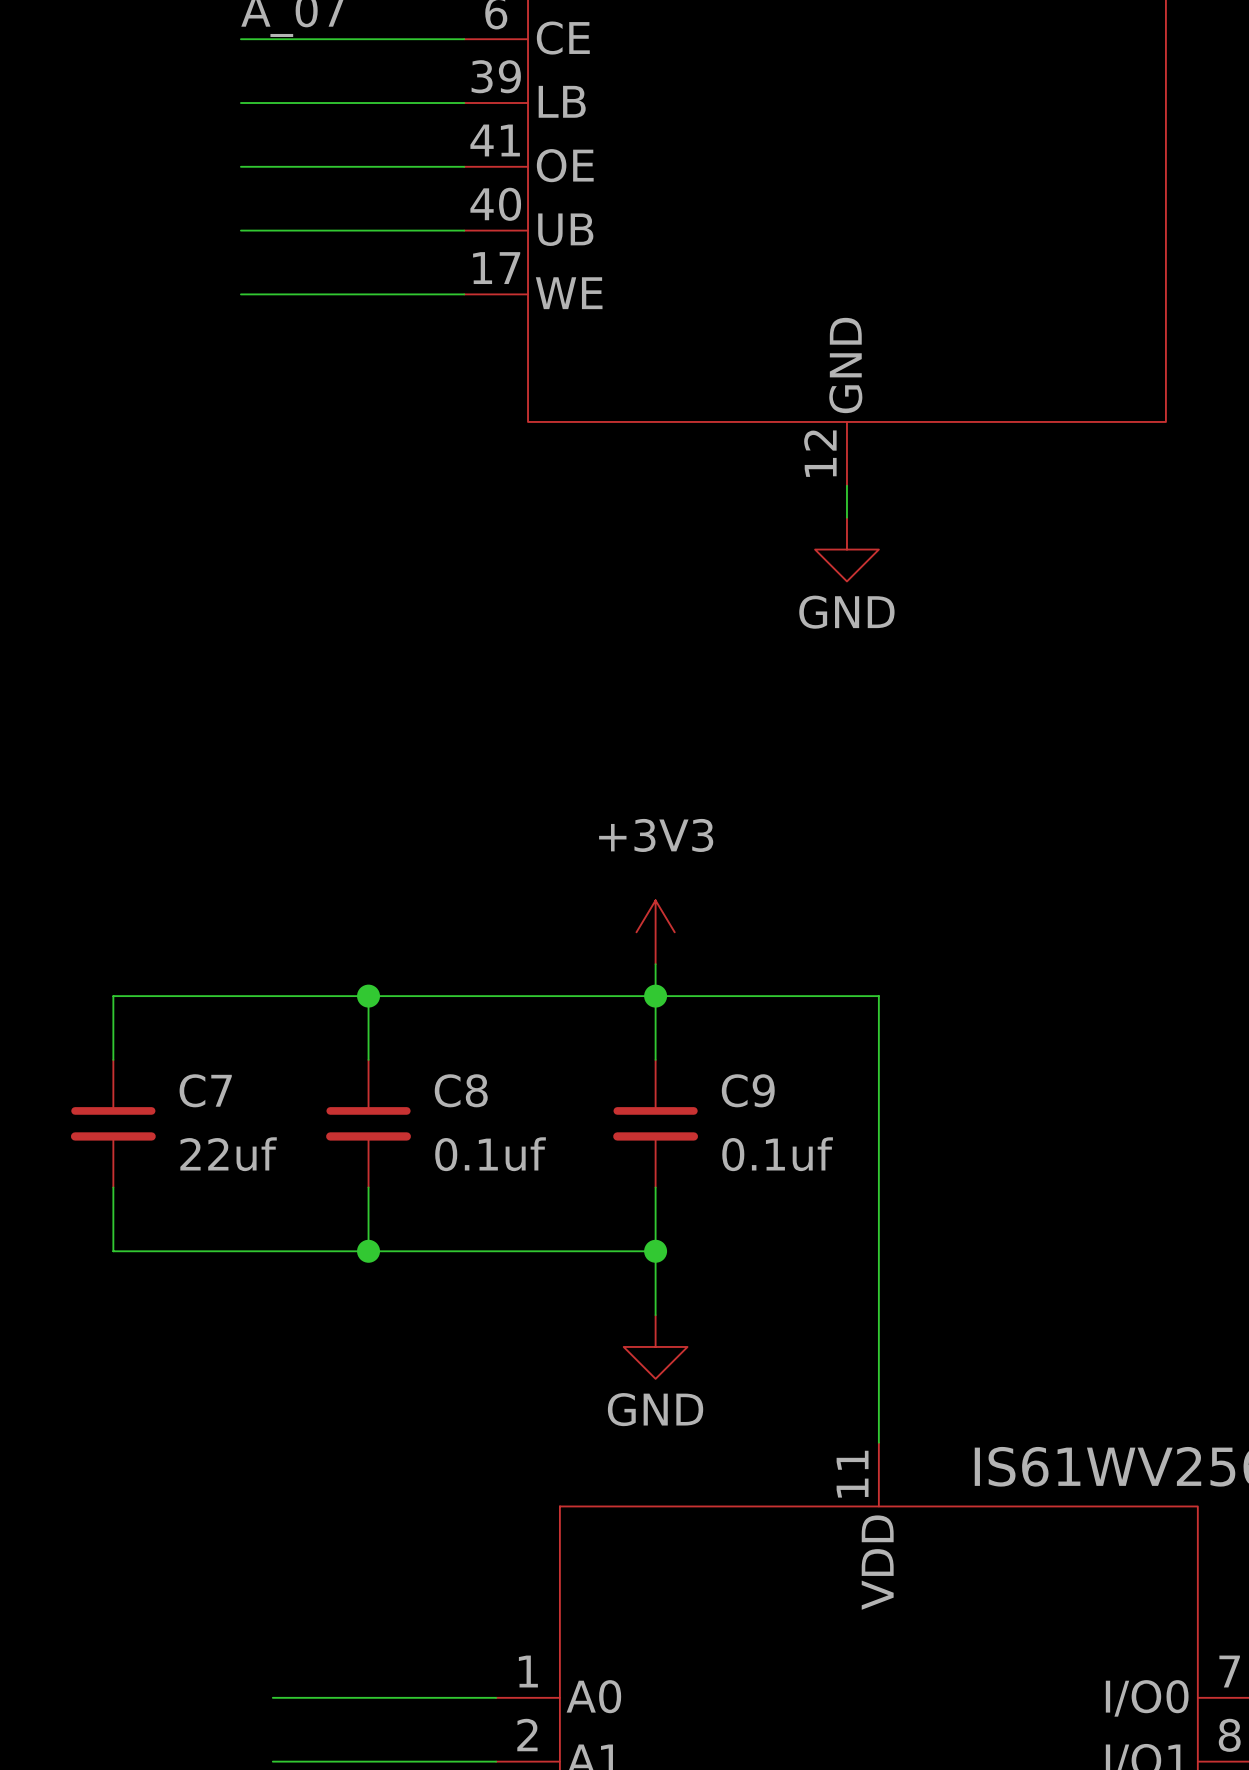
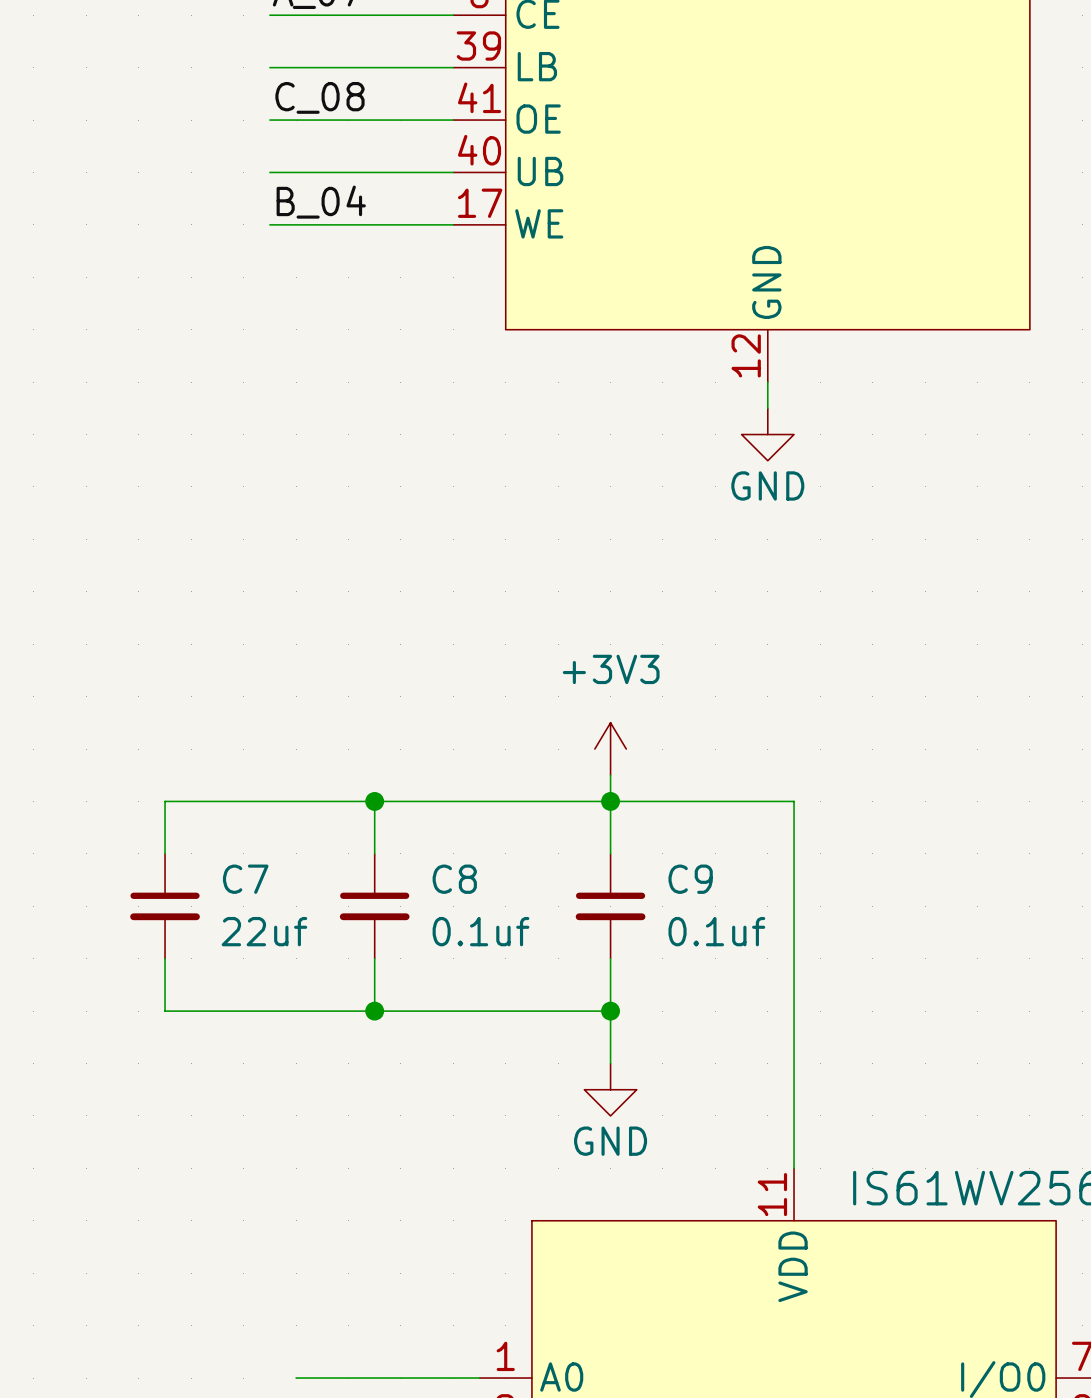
label: none -> C_08 (319, 97)
label: none -> B_04 (321, 202)

